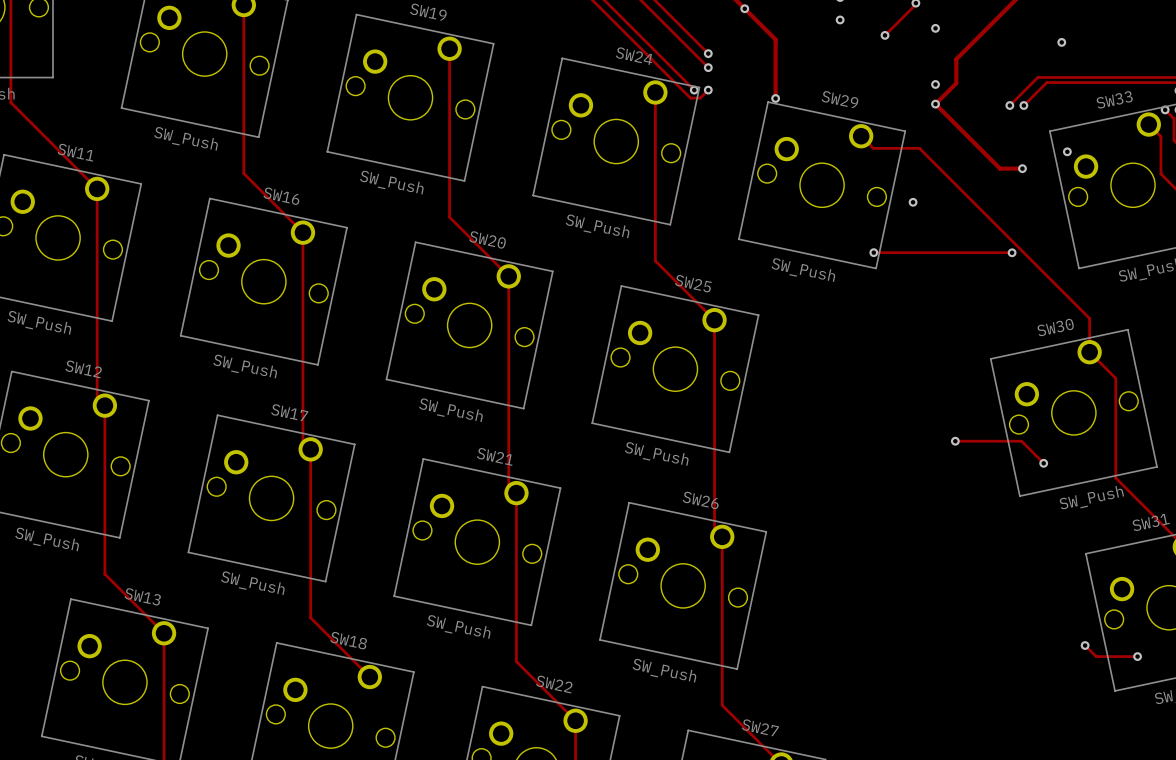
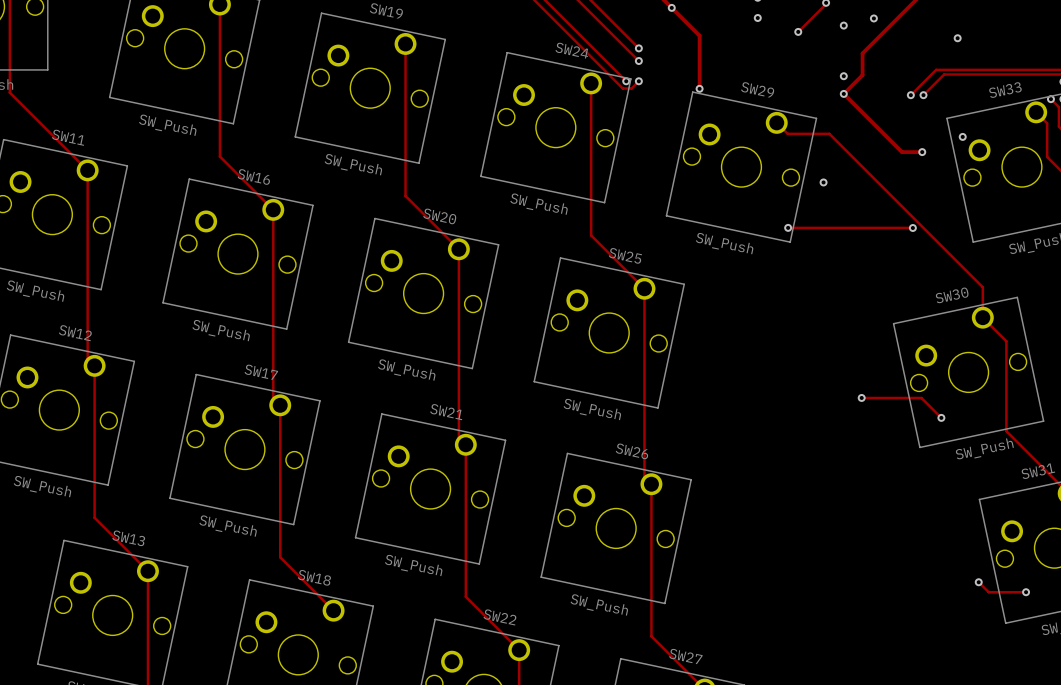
via: none -> (873, 18)

